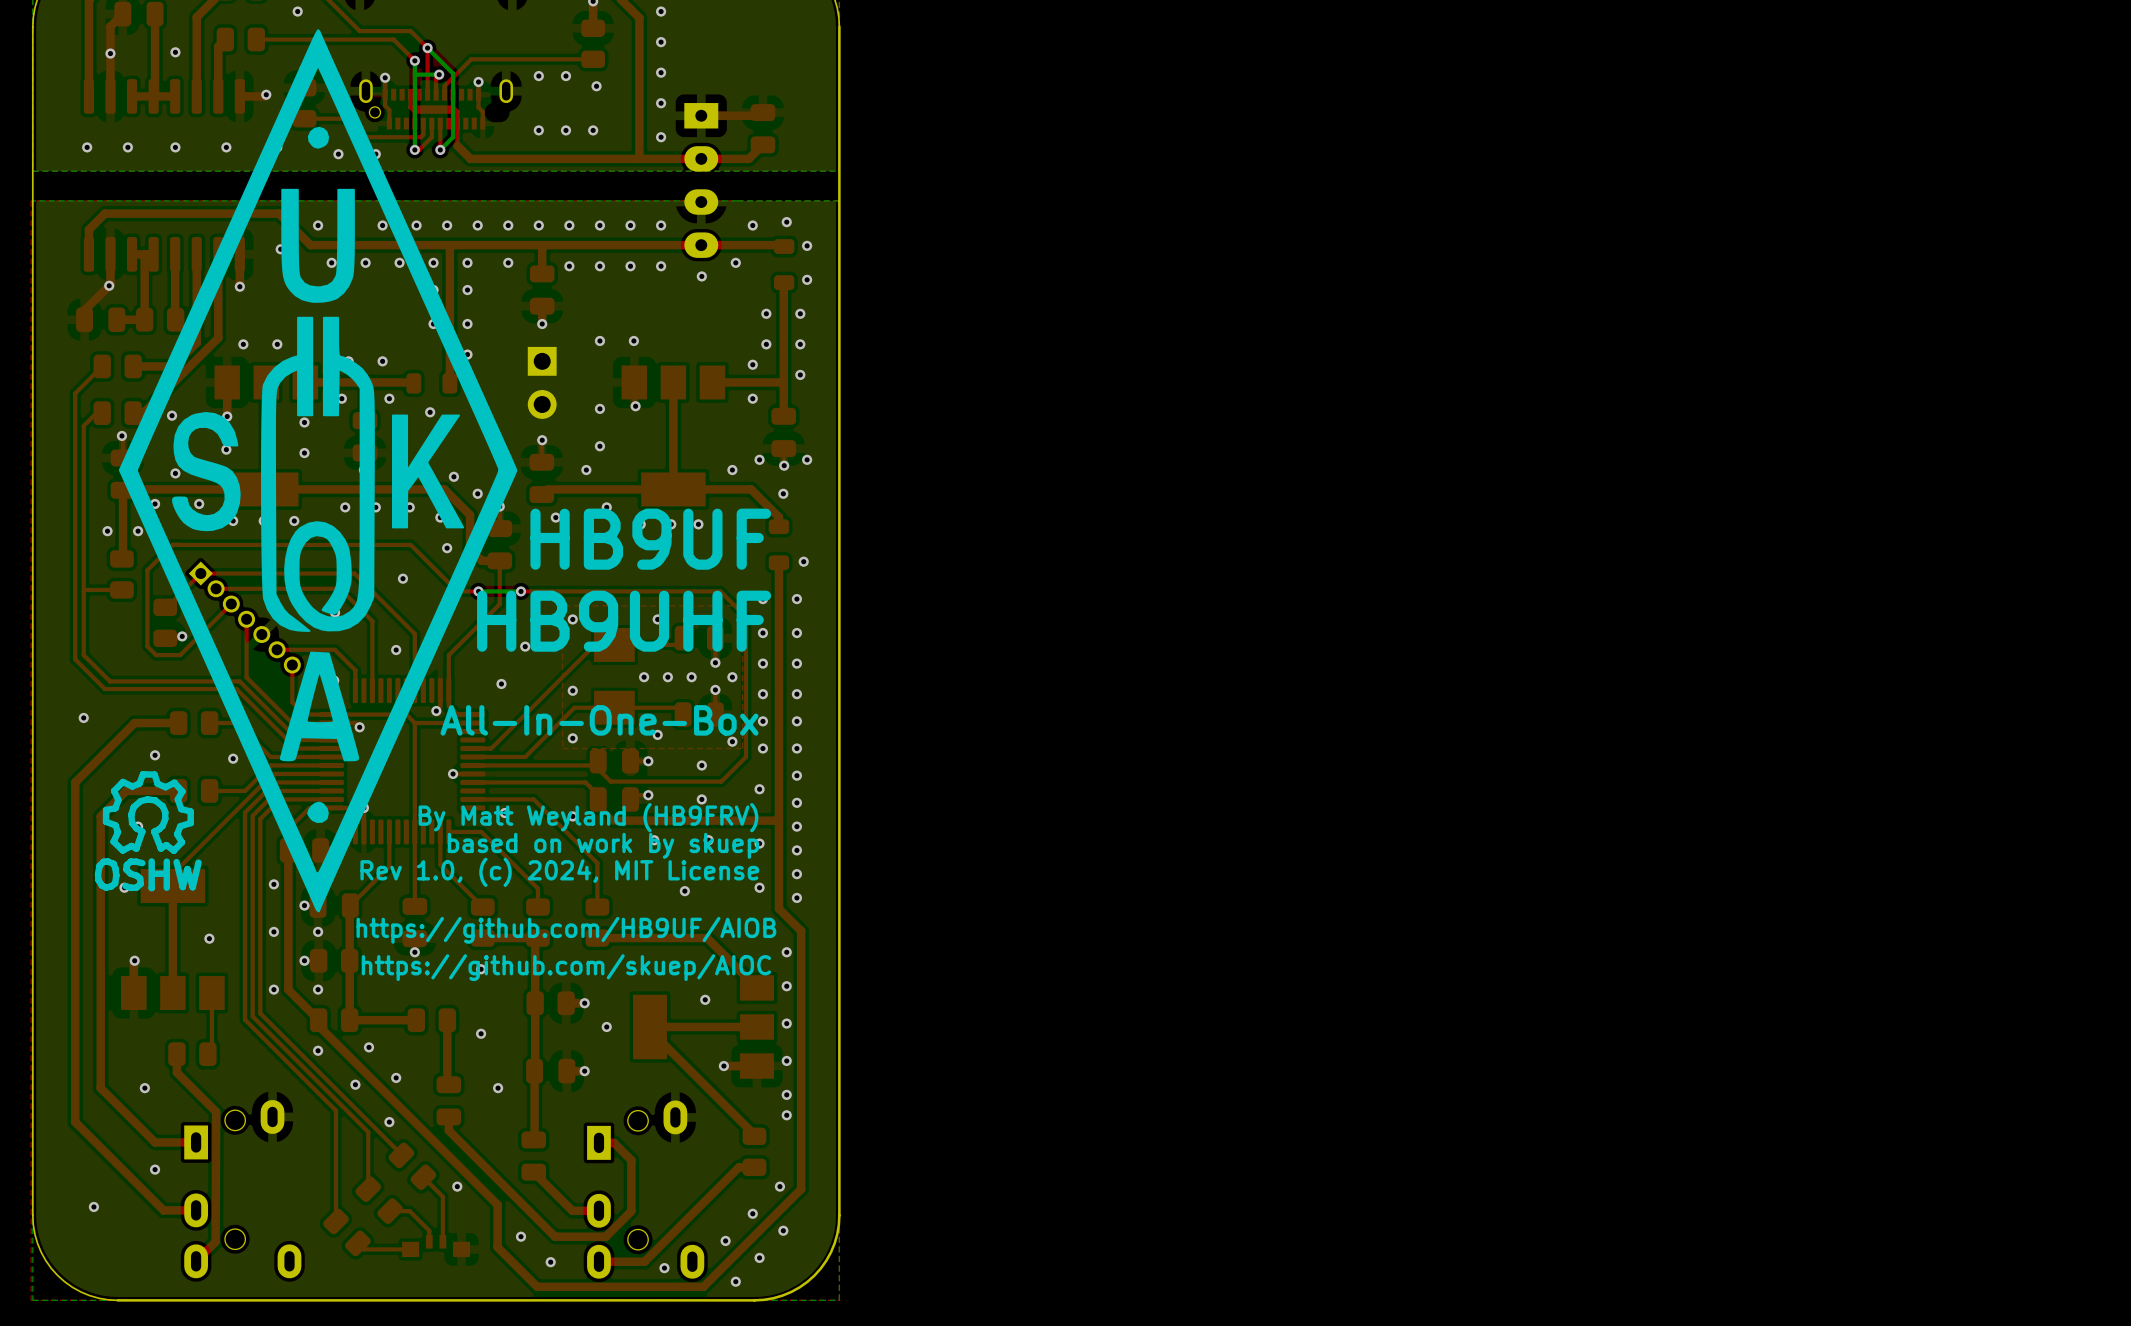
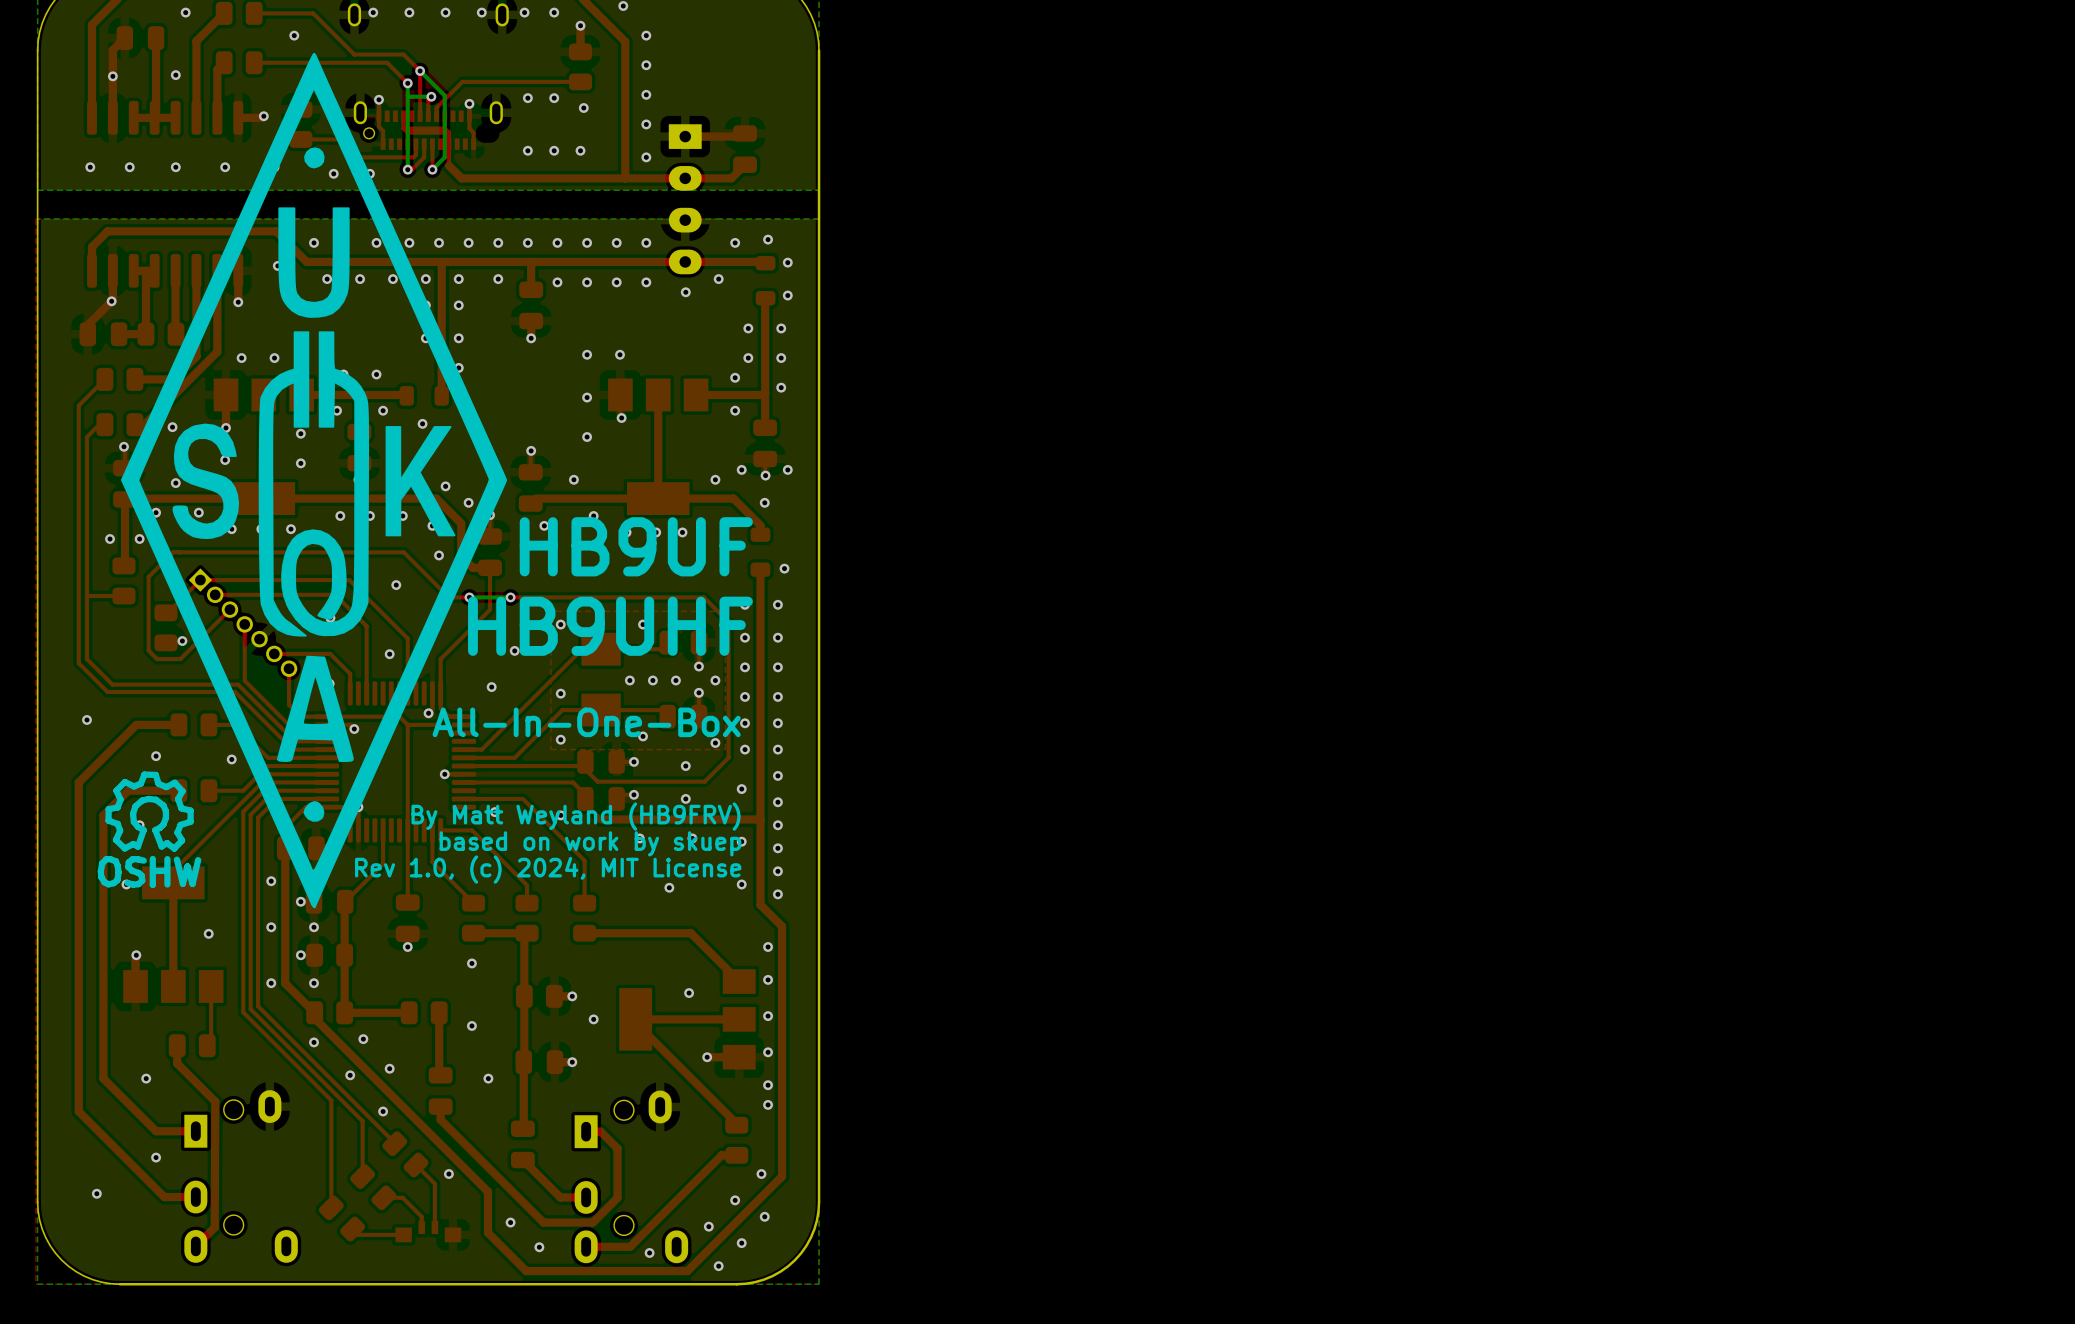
part: (542, 382) -> none
via: none -> (587, 397)
via: (599, 408) -> none
via: none -> (587, 437)
via: (599, 446) -> none
text: https://github.com/HB9UF/AIOB (566, 930) -> none
text: https://github.com/skuep/AIOC (566, 967) -> none

